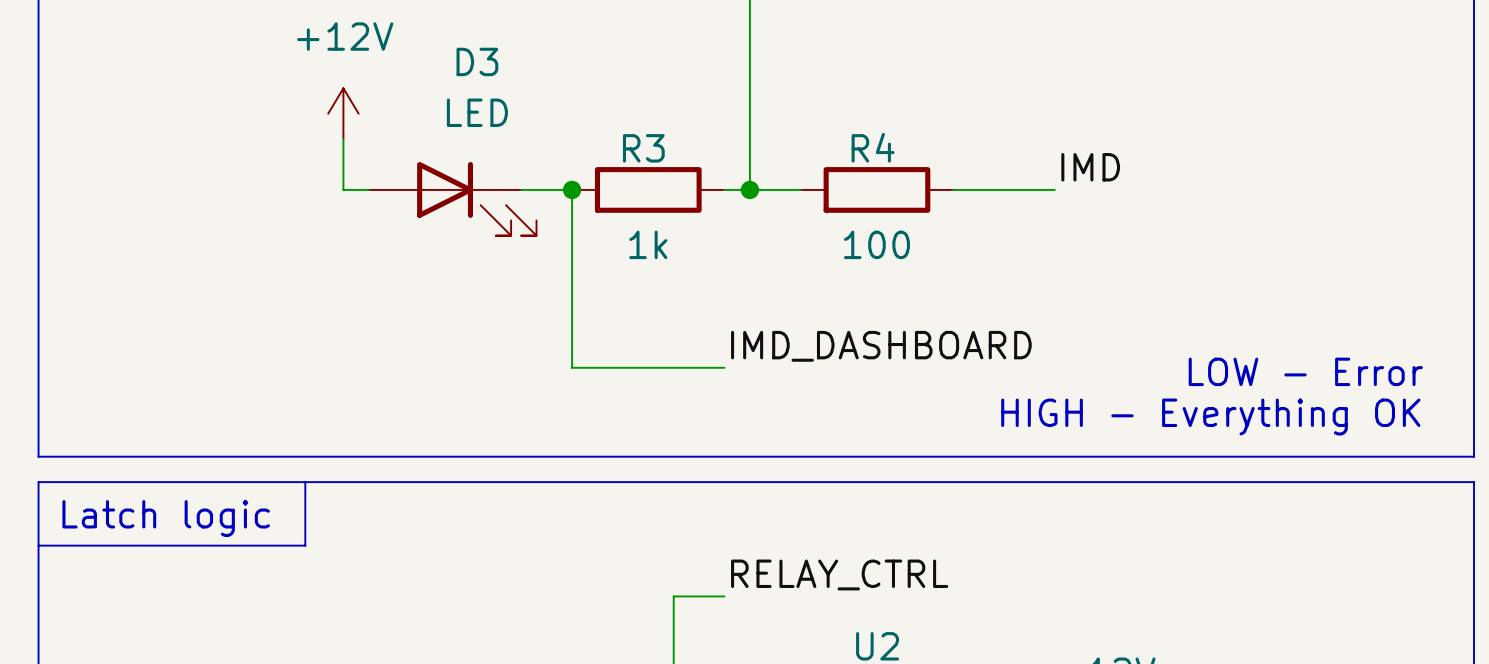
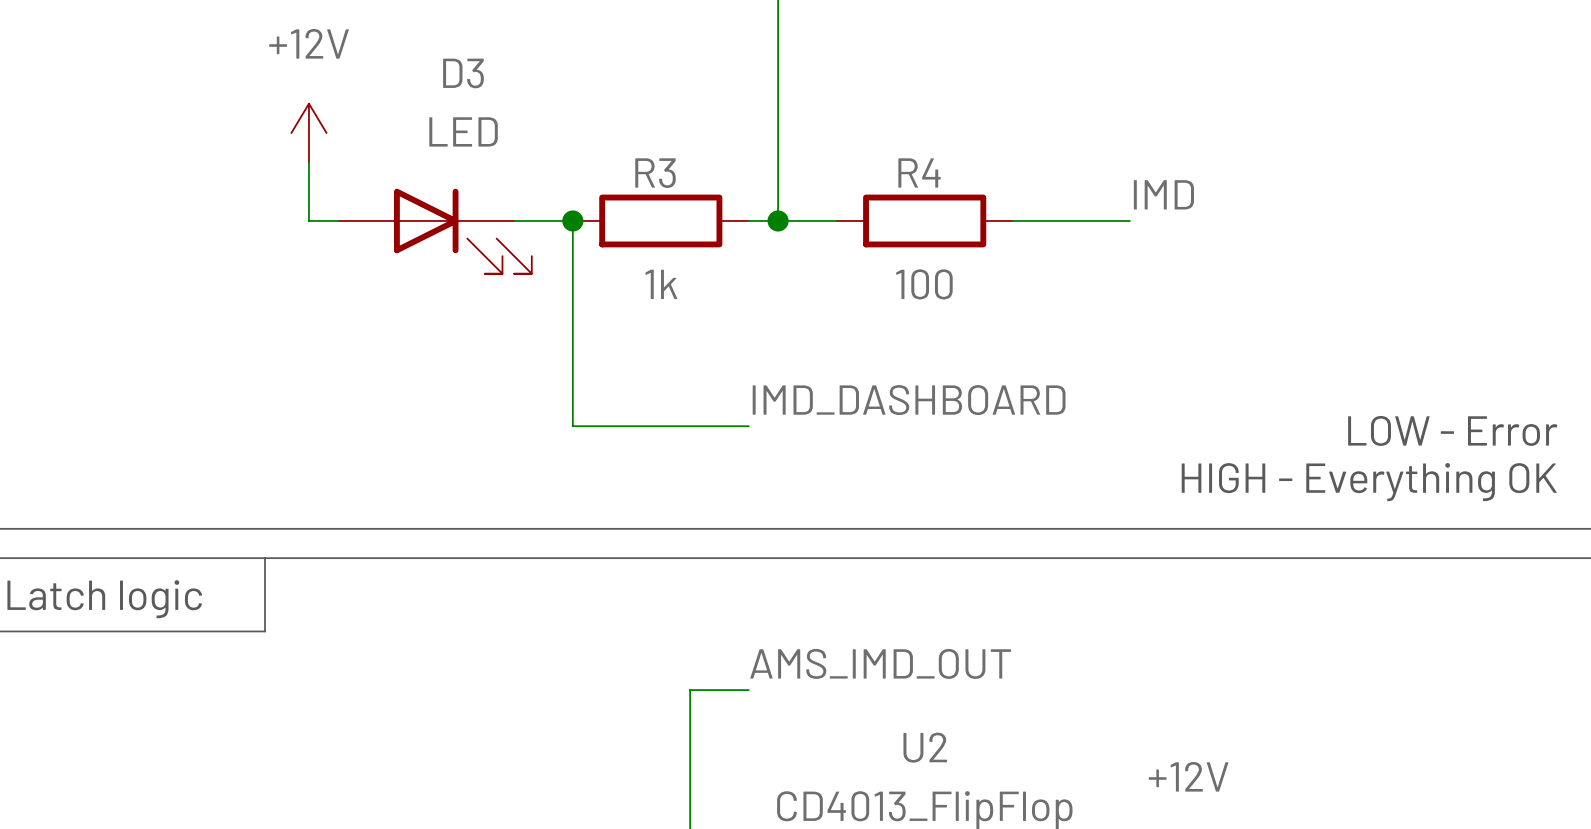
label: RELAY_CTRL (839, 574) -> AMS_IMD_OUT (880, 663)

